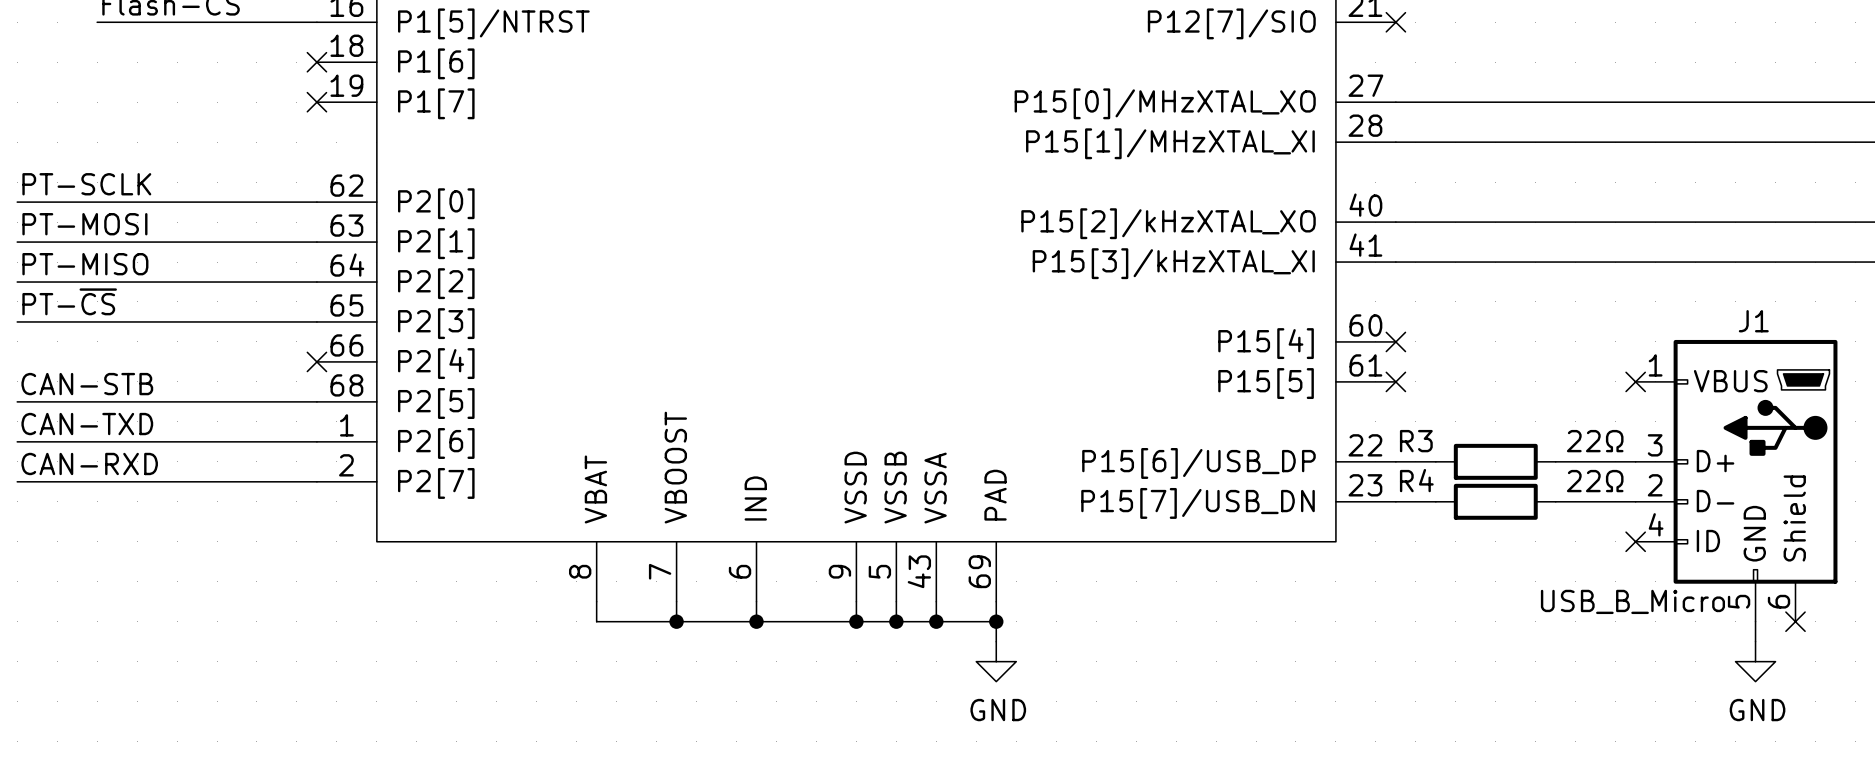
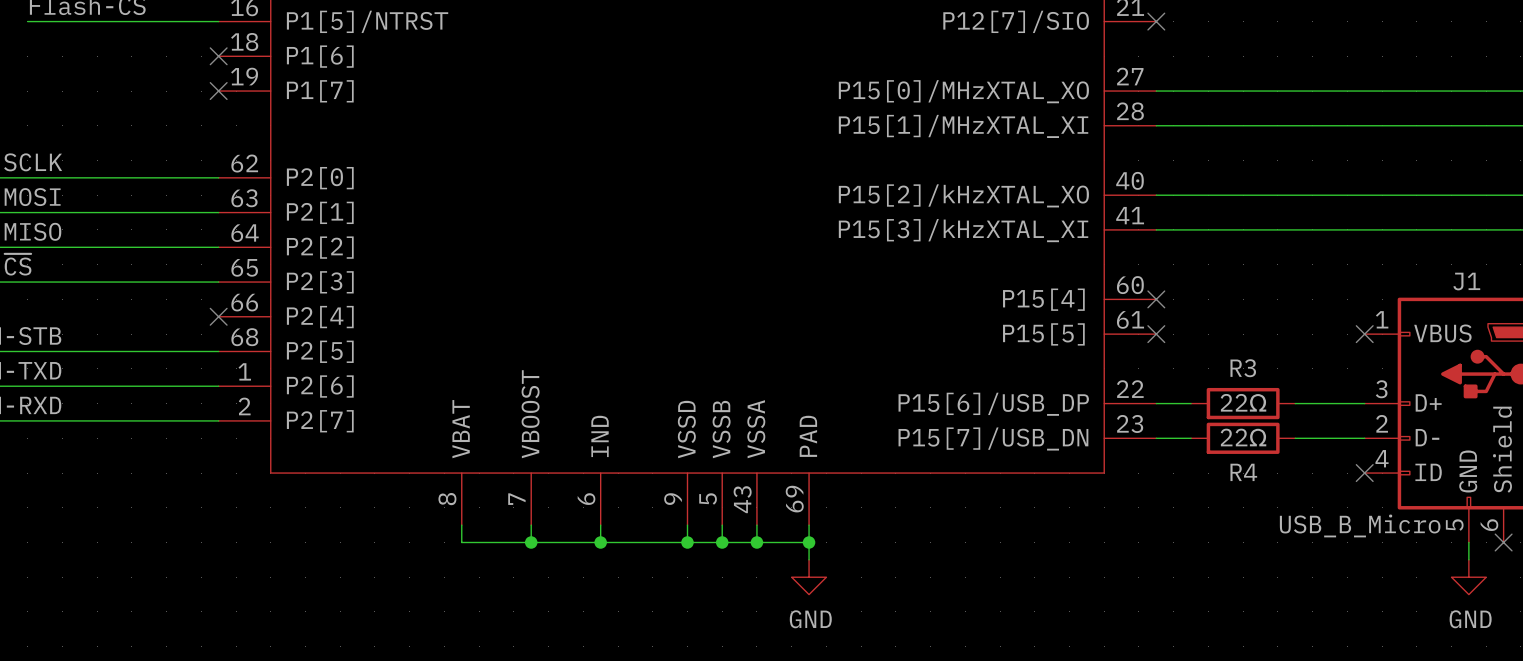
R3 name position: R3 (1416, 441) -> R3 (1243, 368)
R3 value position: 22Ω (1595, 441) -> 22Ω (1243, 402)
R4 name position: R4 (1416, 480) -> R4 (1243, 472)
R4 value position: 22Ω (1595, 481) -> 22Ω (1243, 437)

